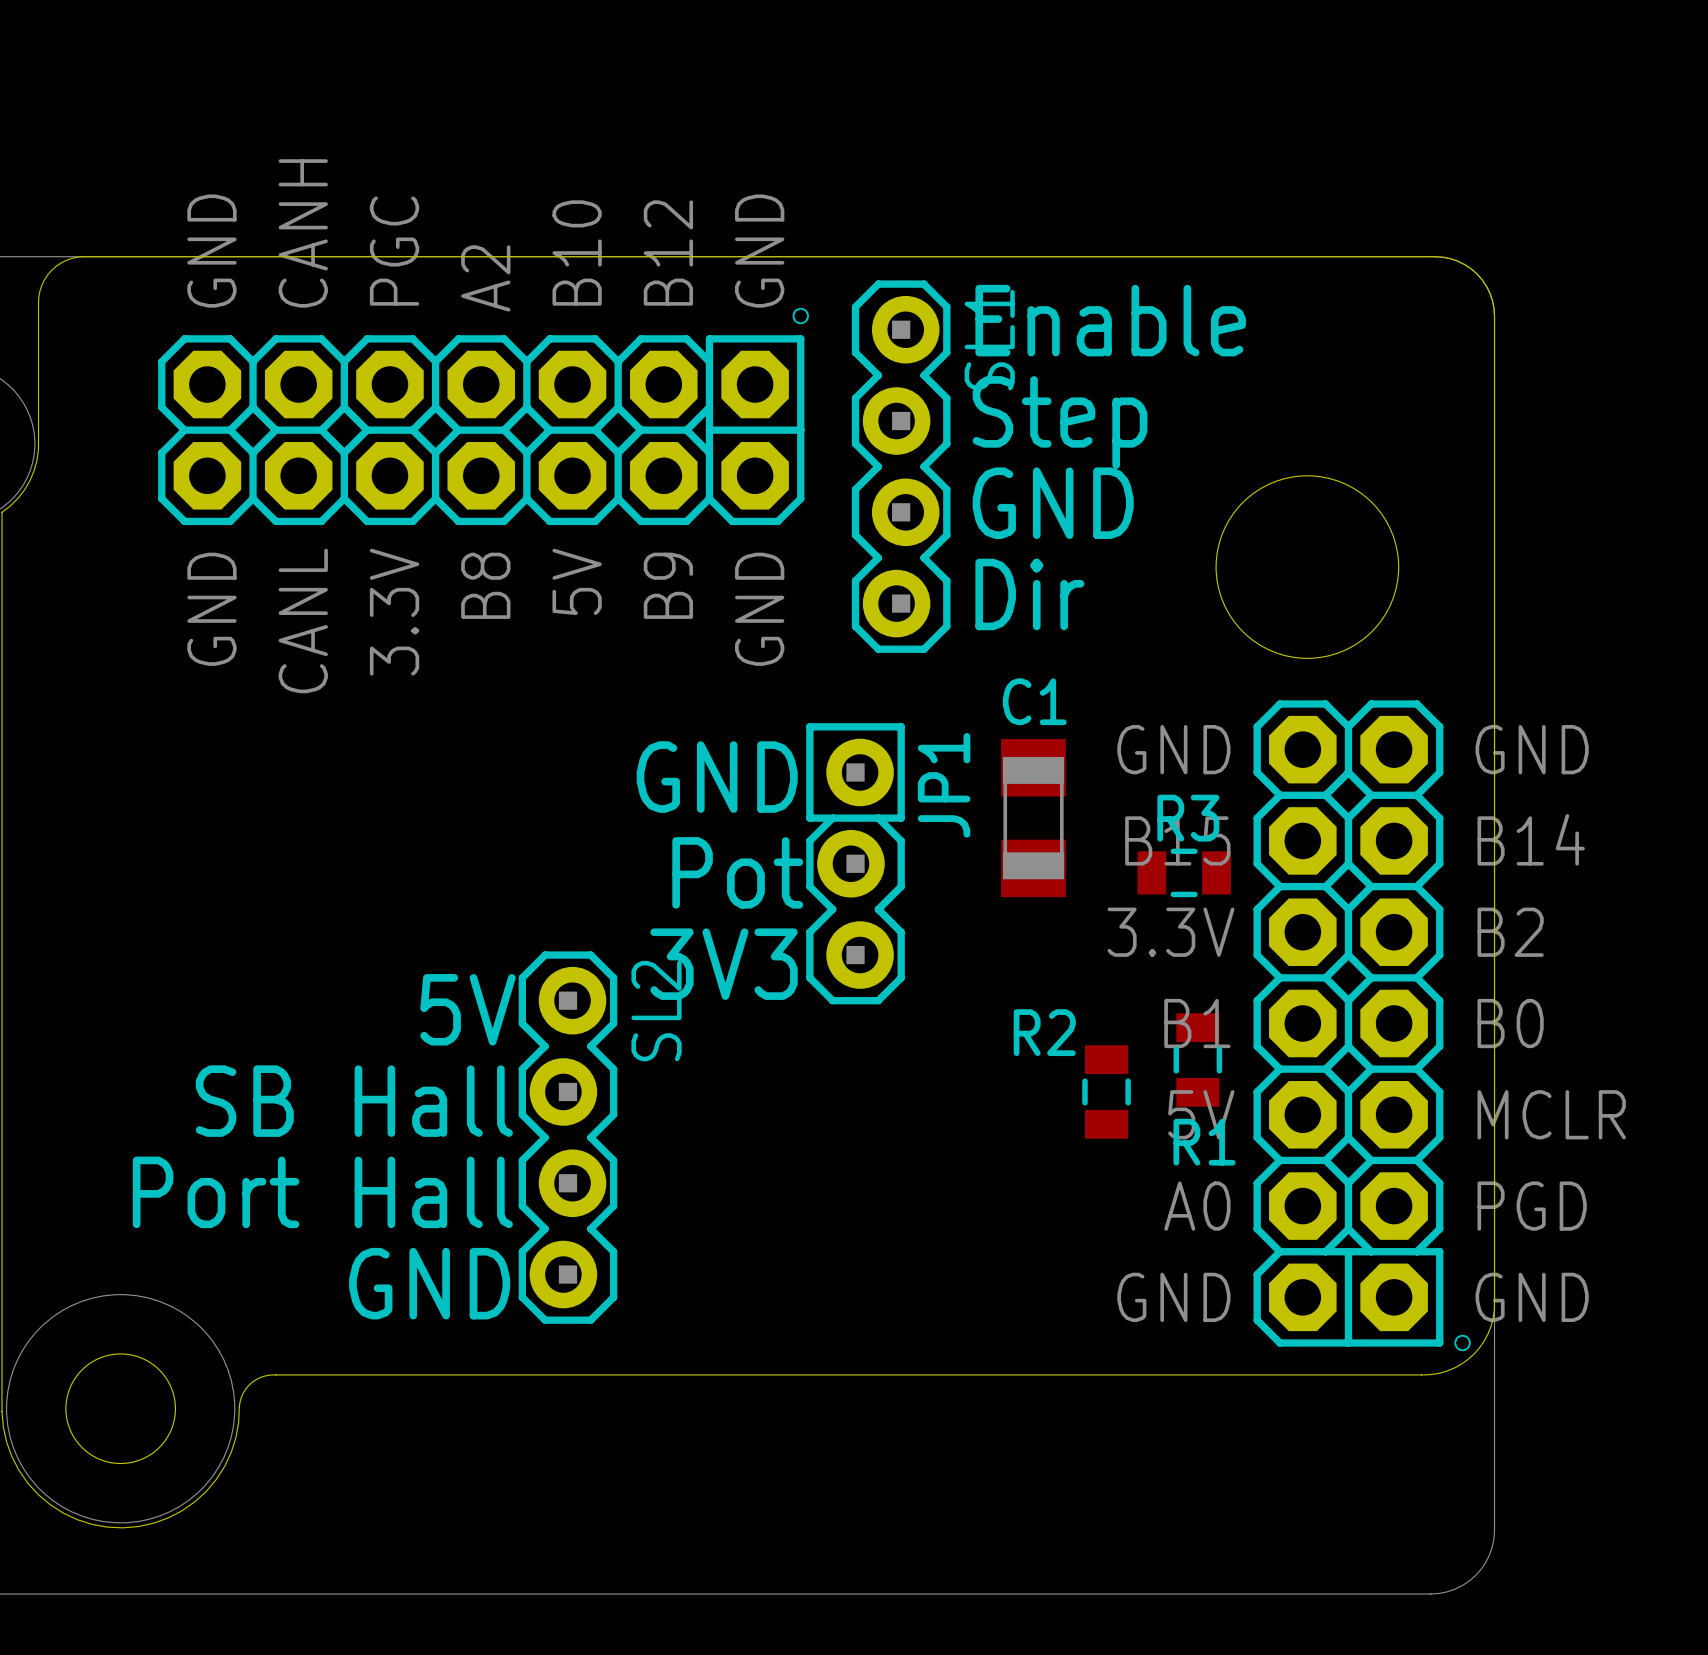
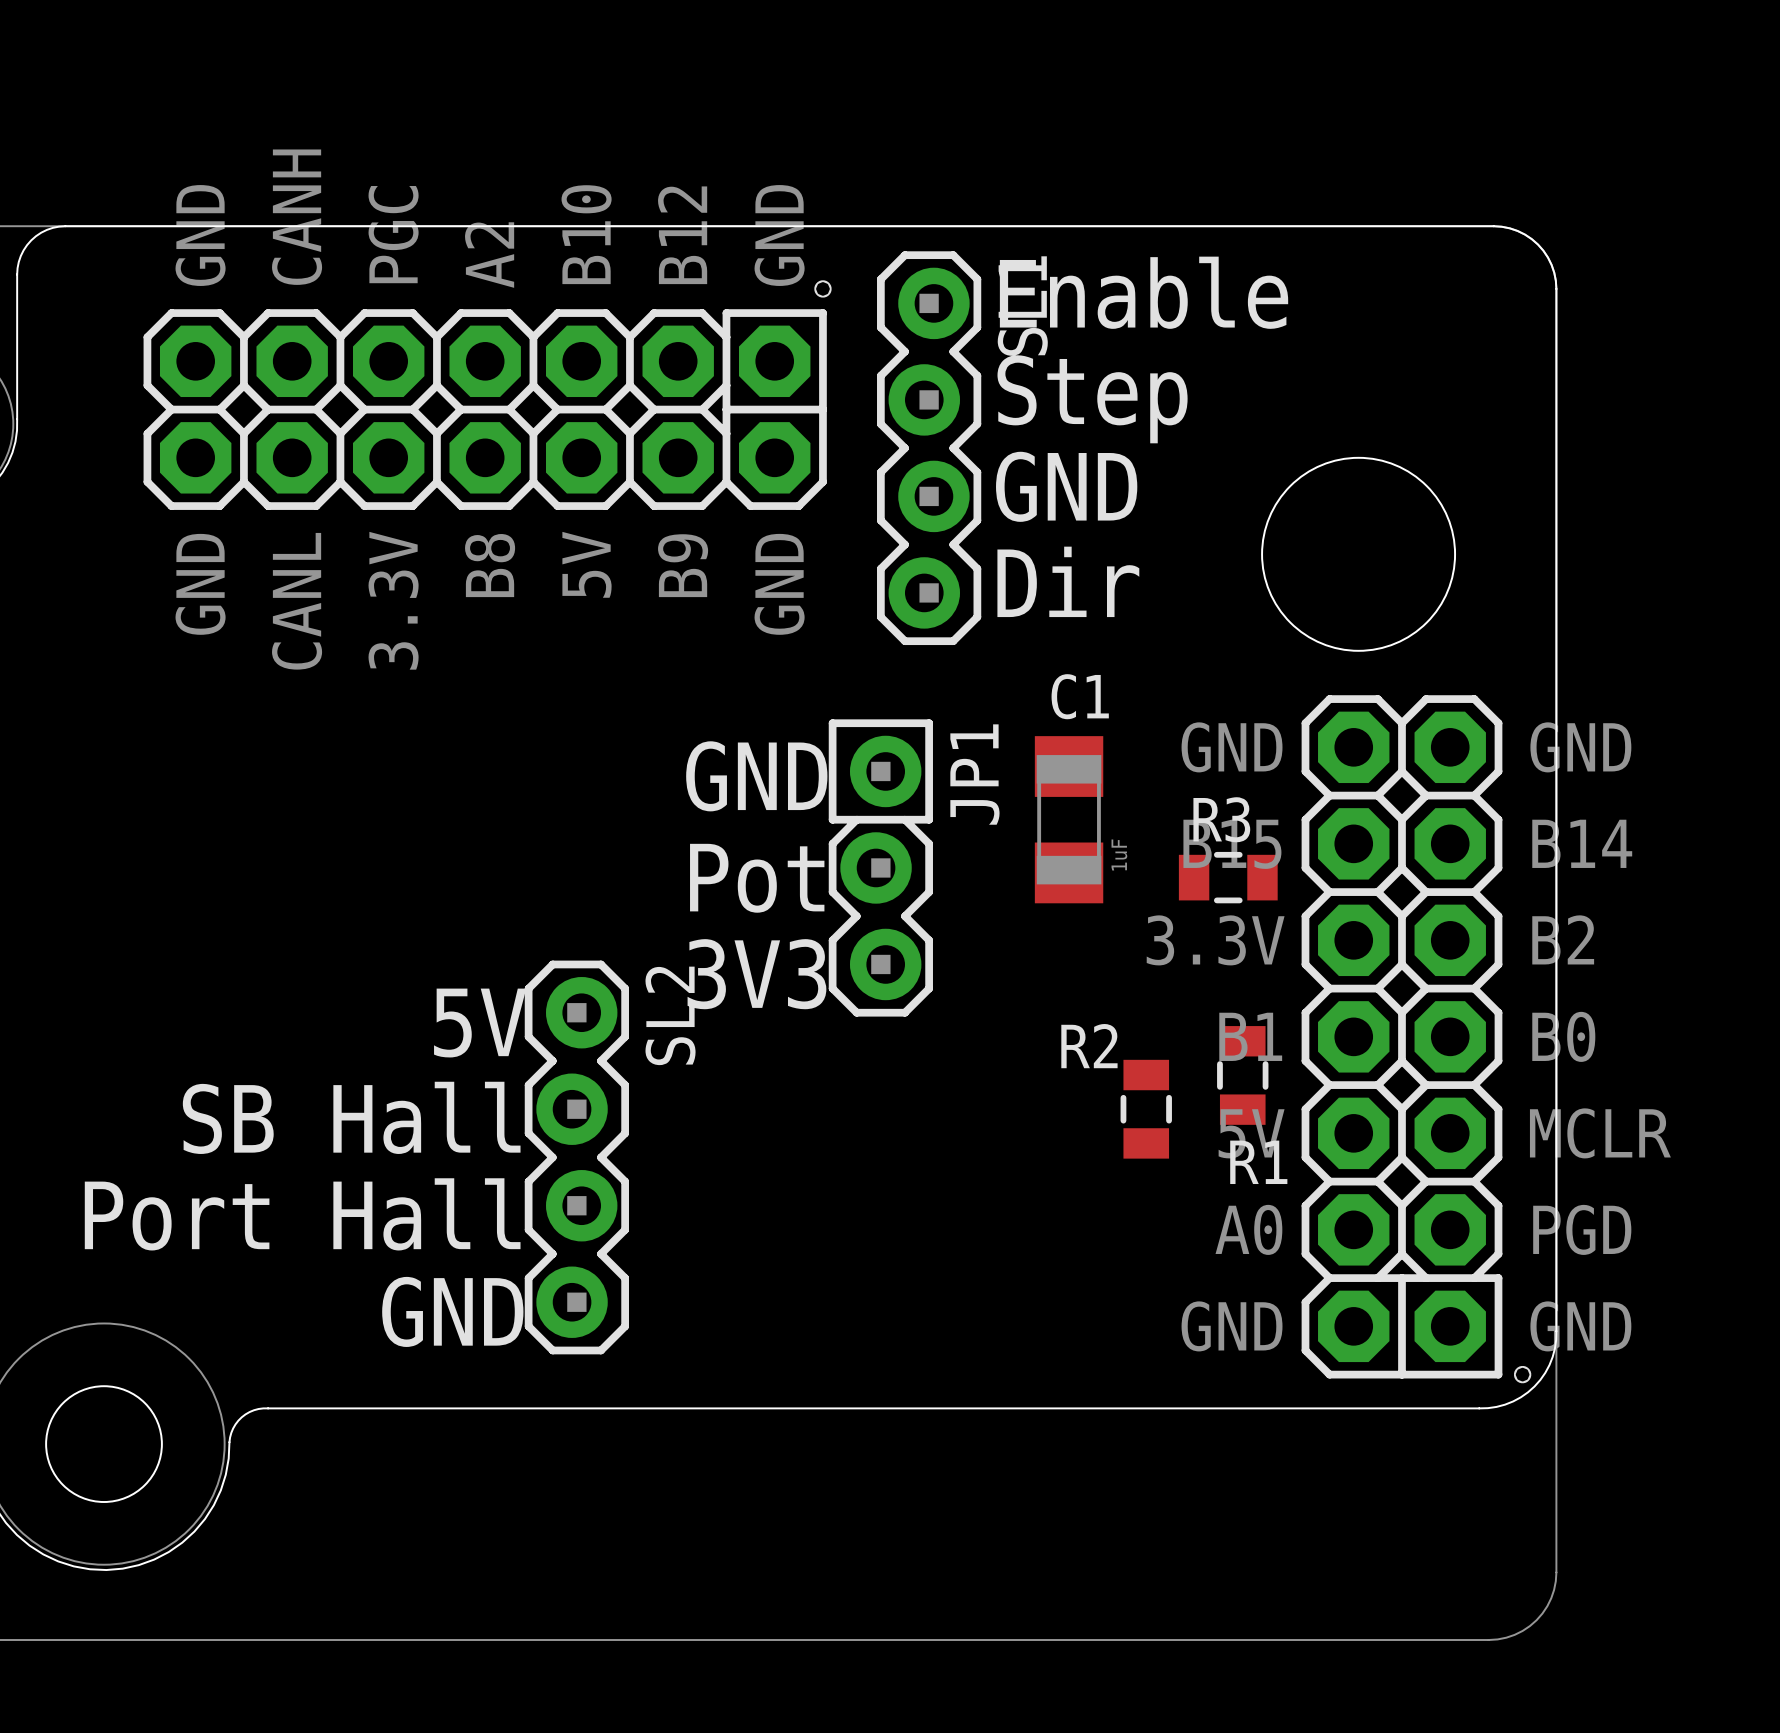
C1 value: none -> 1uF (1119, 854)

